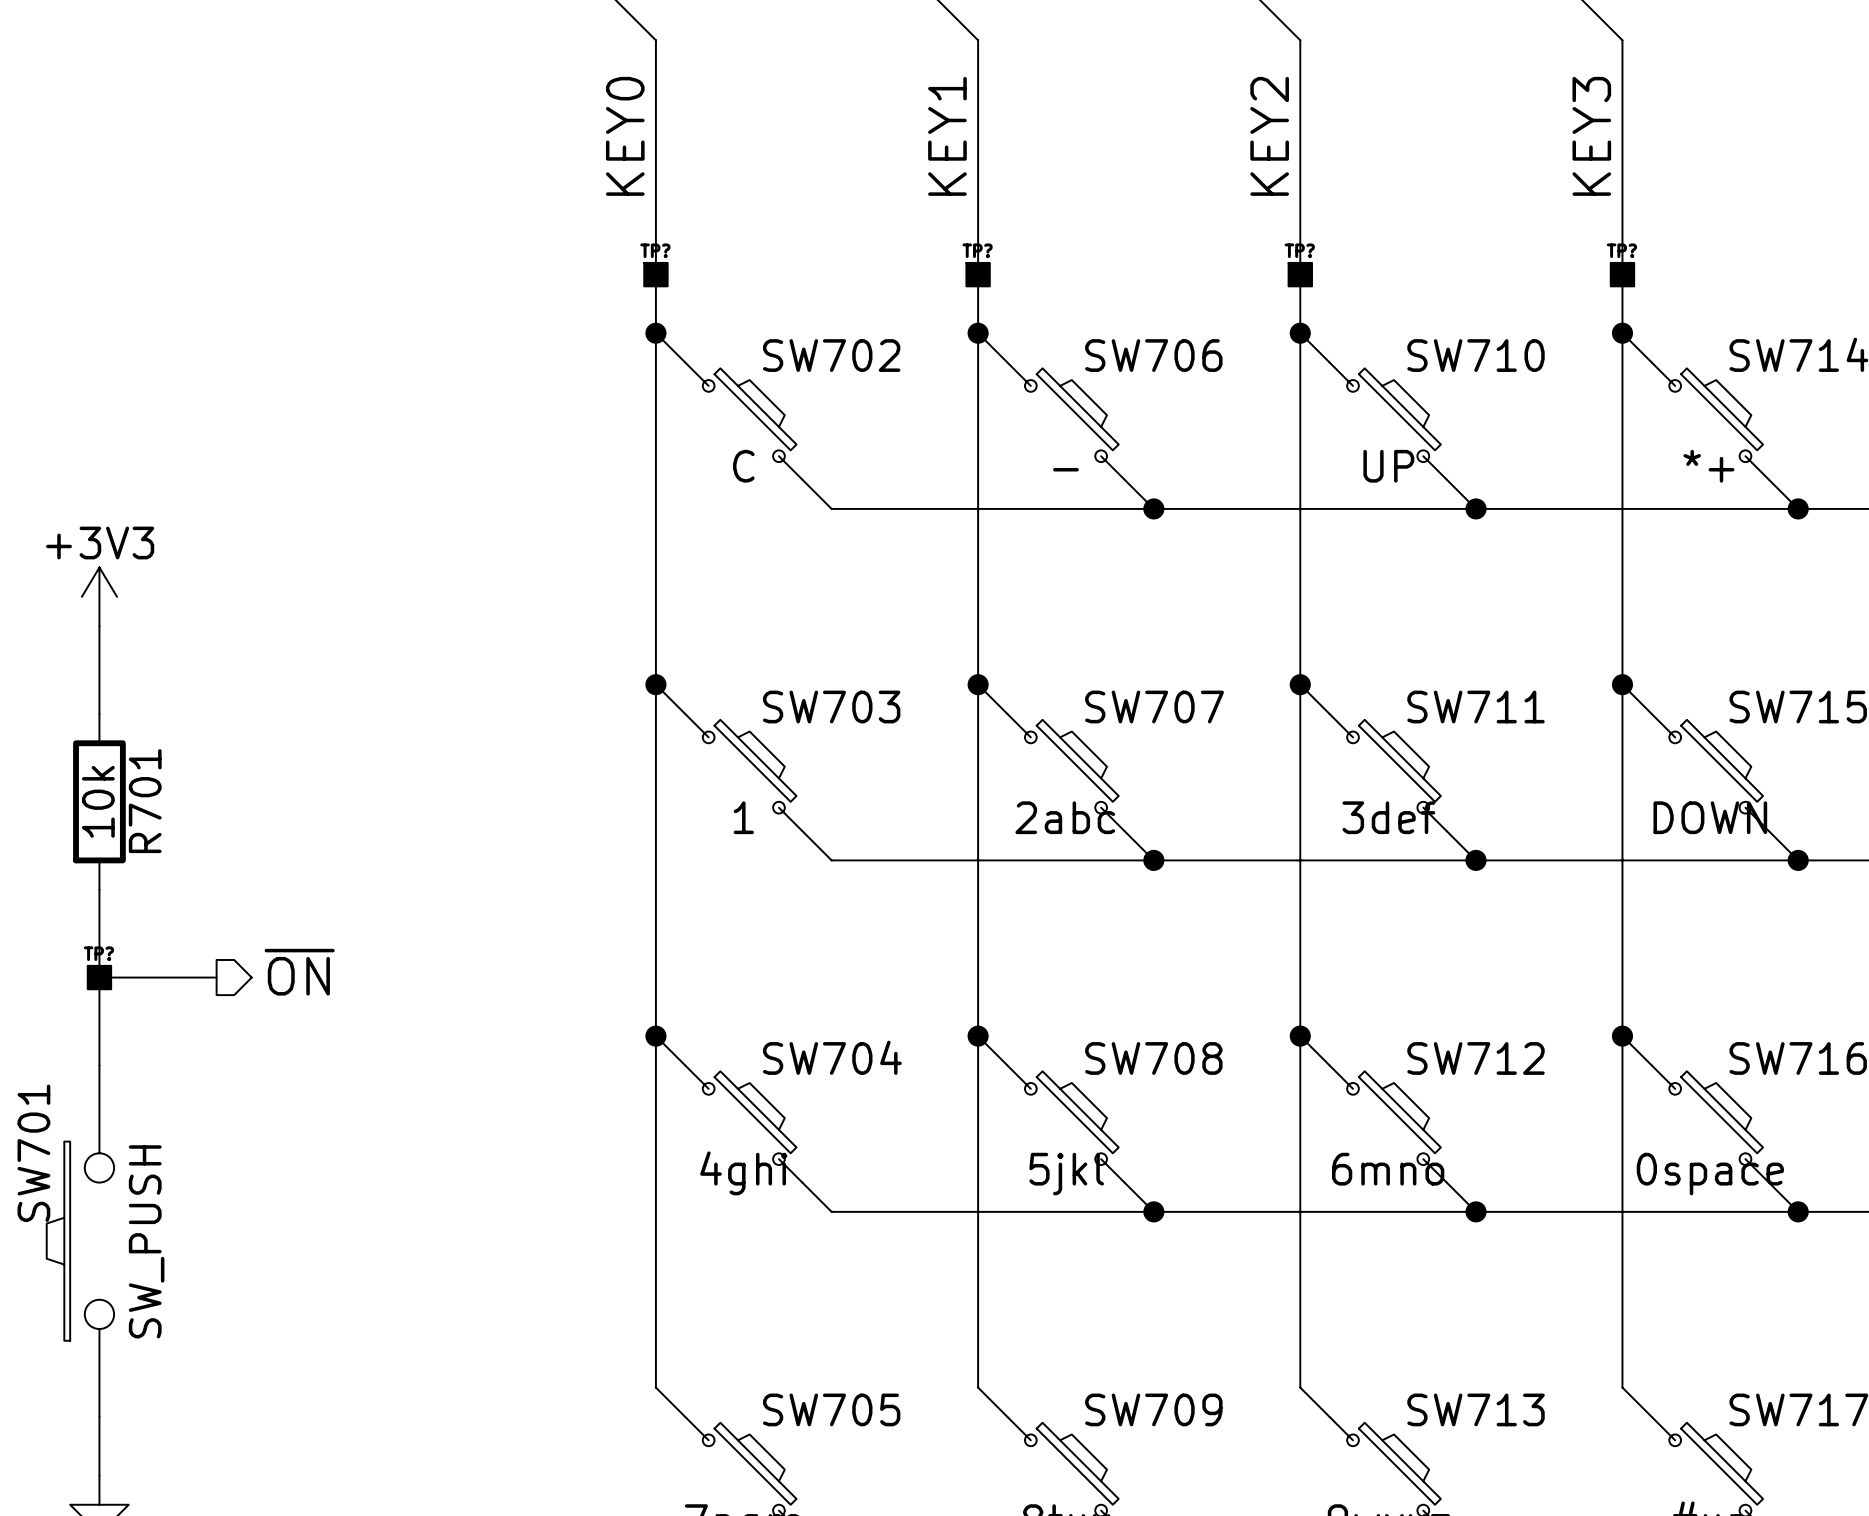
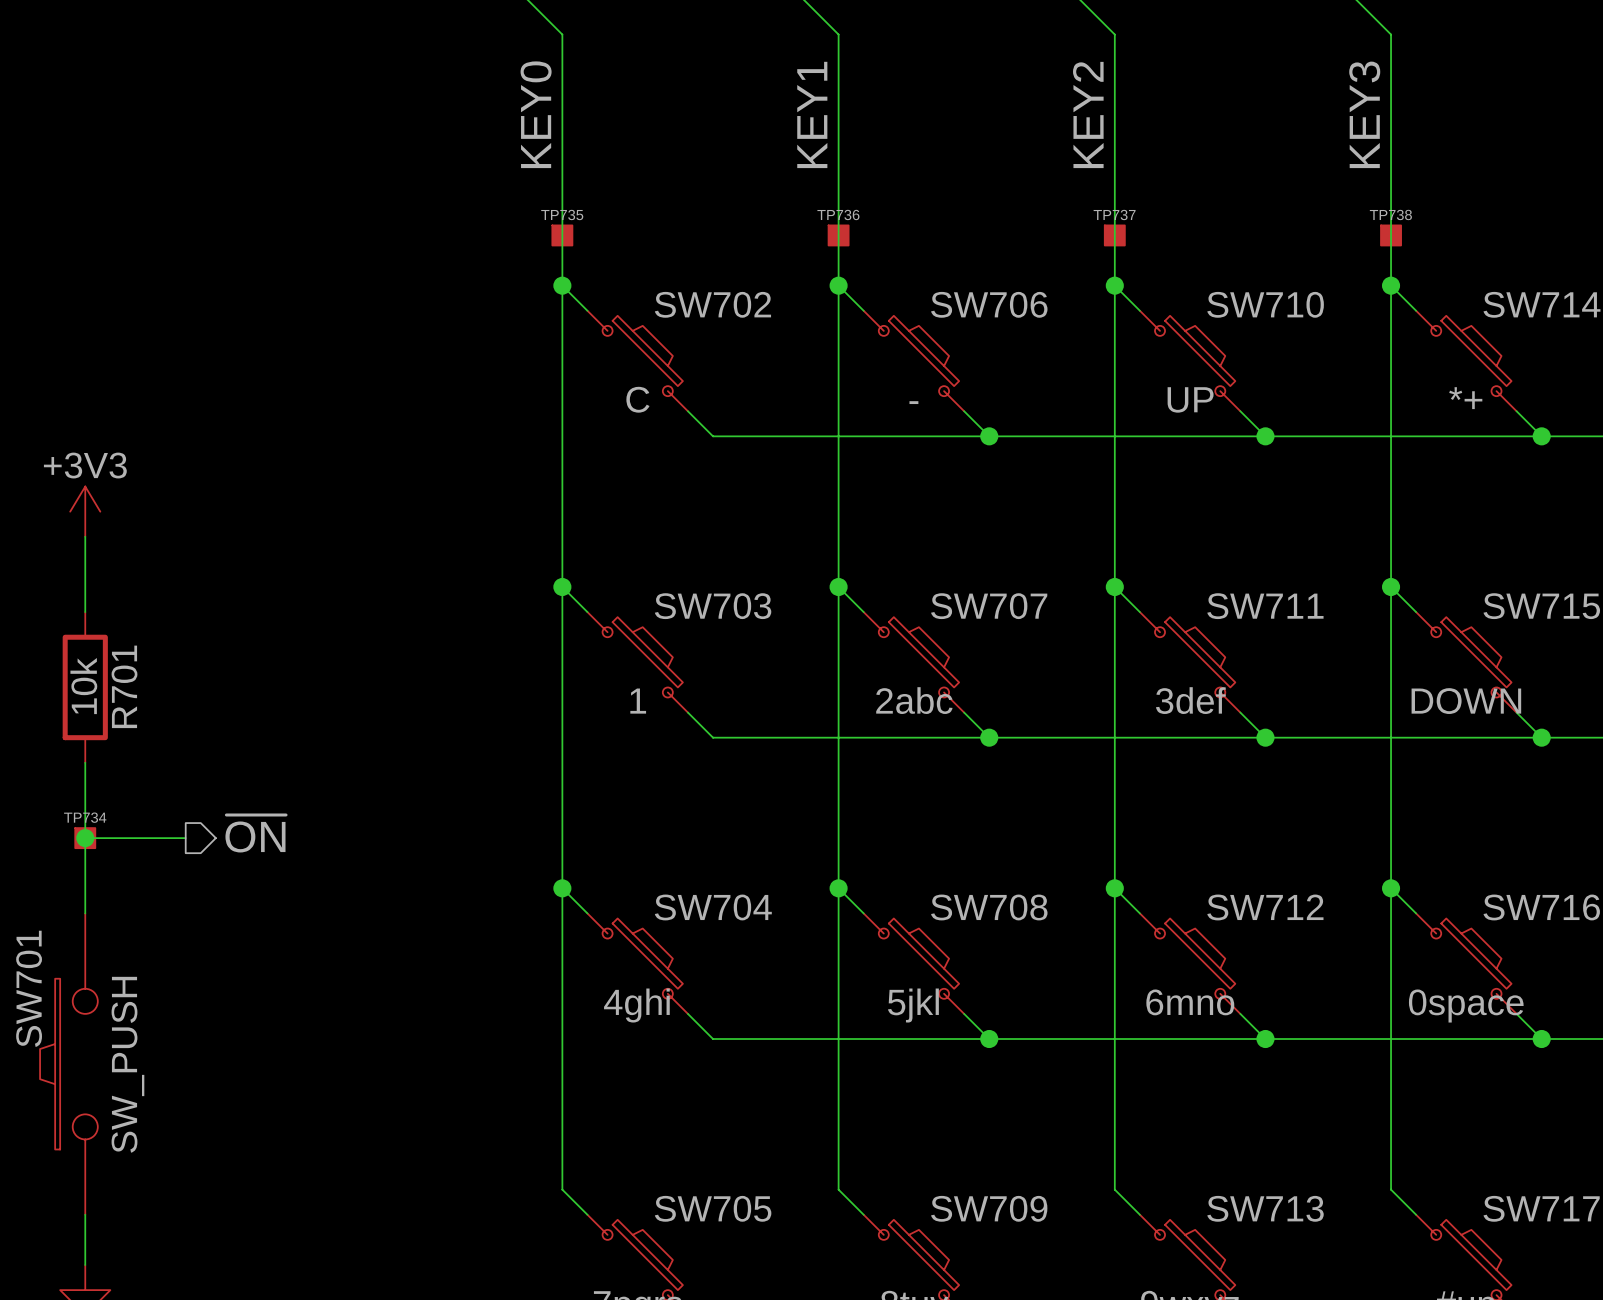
TP? name: TP? (655, 250) -> TP735 (562, 214)
TP? name: TP? (977, 250) -> TP736 (838, 214)
TP? name: TP? (1299, 250) -> TP737 (1114, 214)
TP? name: TP? (1621, 250) -> TP738 (1390, 214)
TP? name: TP? (98, 953) -> TP734 (85, 817)

